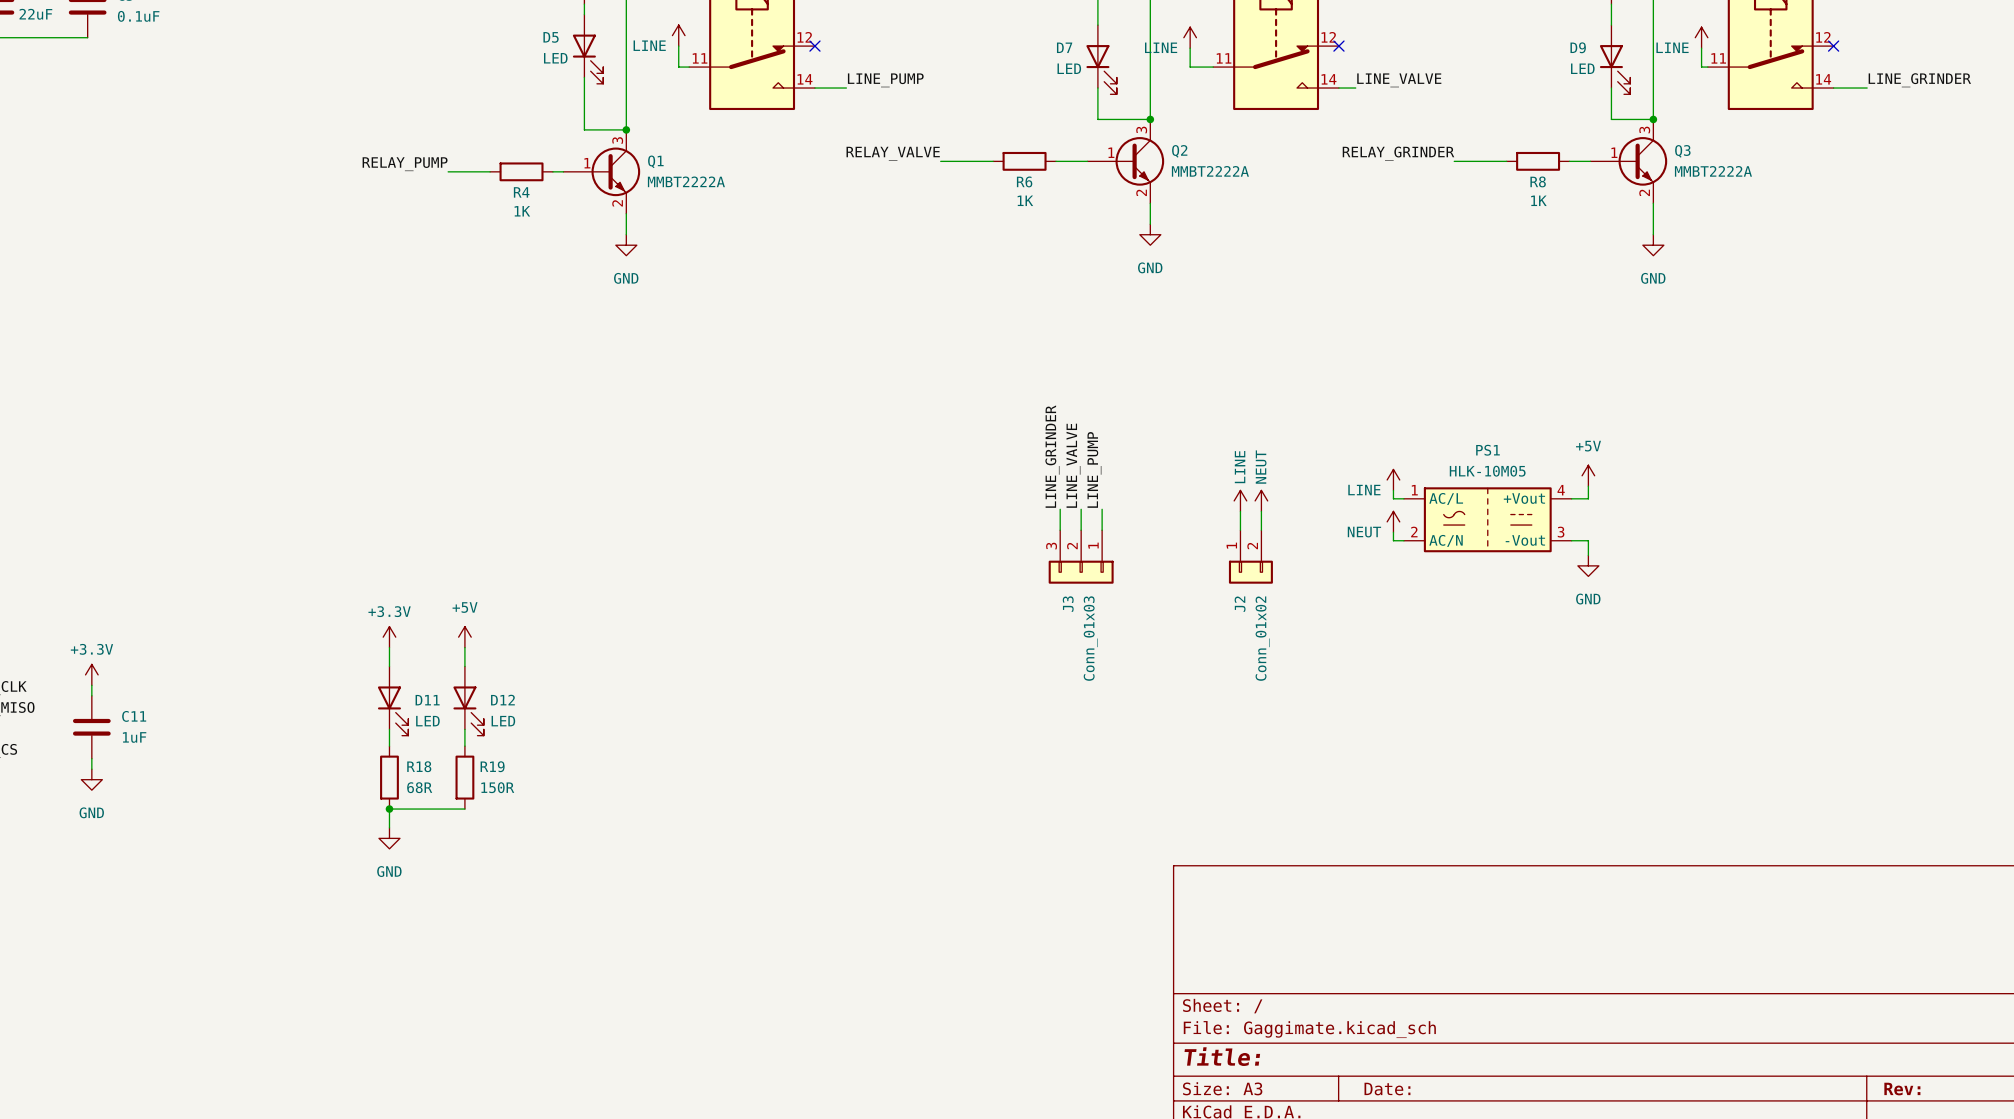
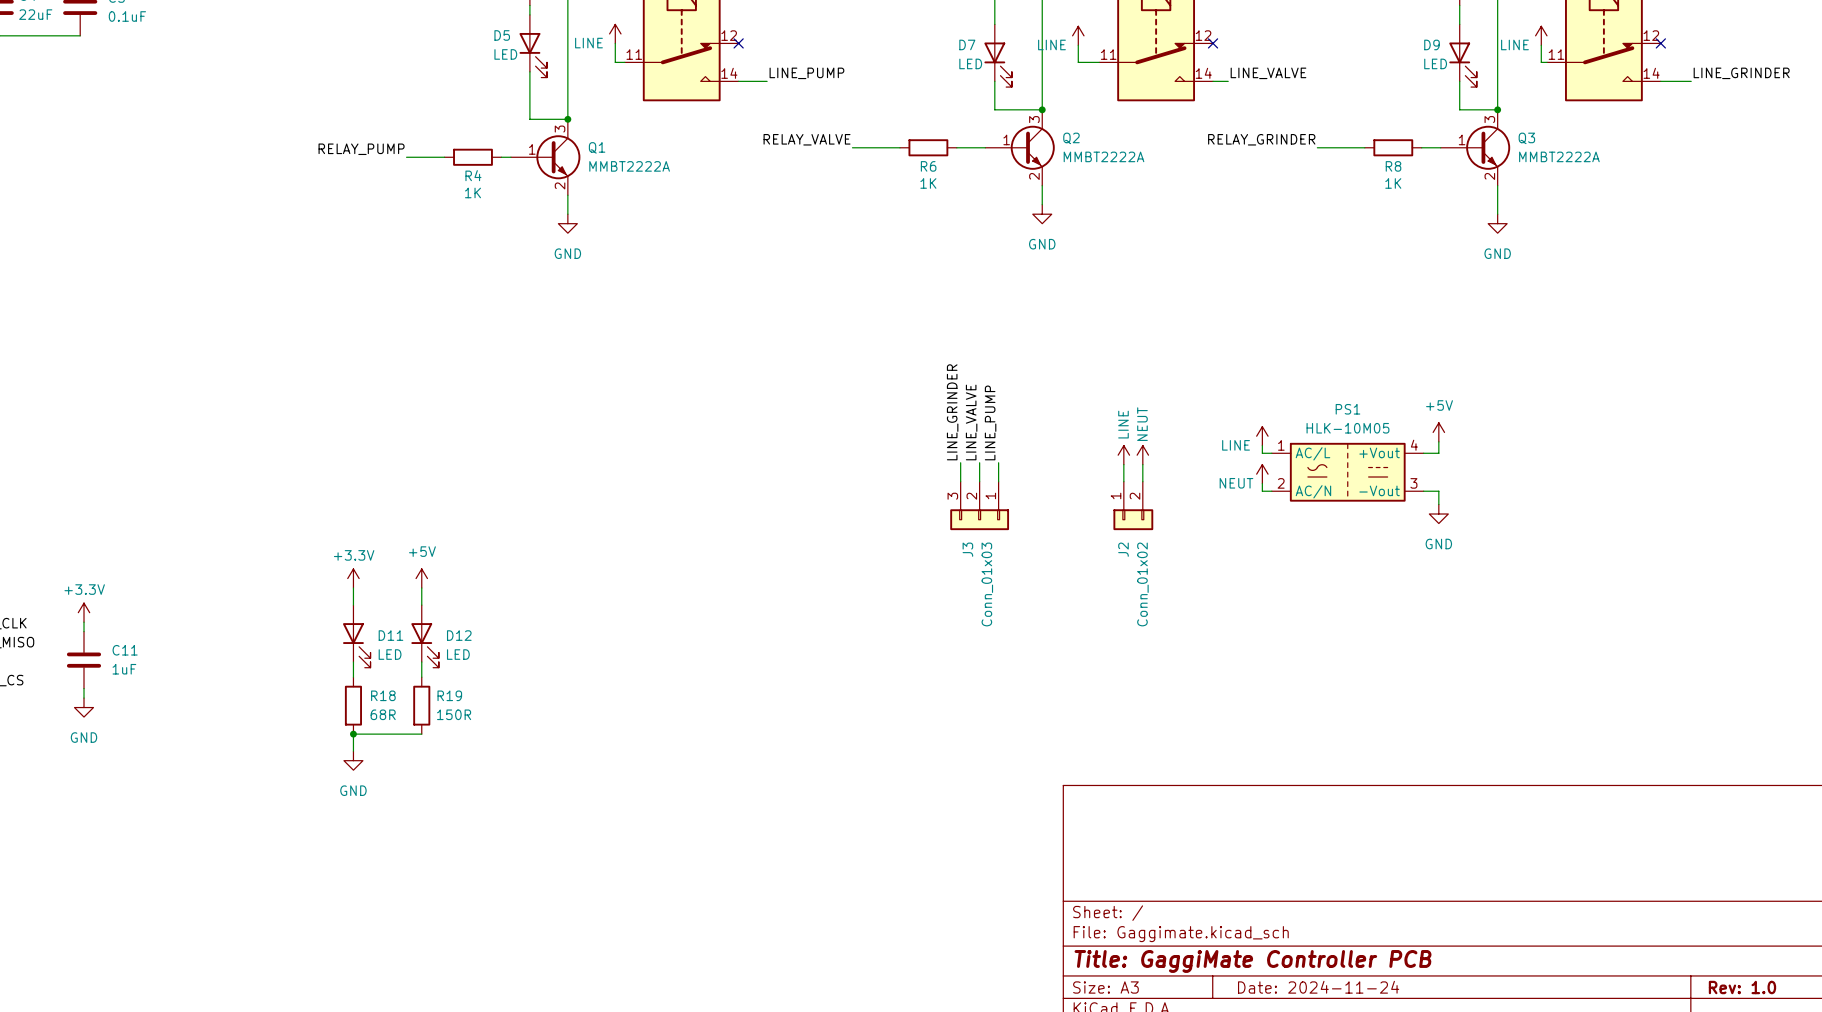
title block: Title: (1222, 1056) -> Title: GaggiMate Controller PCB (1253, 961)
title block: Date: (1387, 1089) -> Date: 2024-11-24 (1318, 987)
title block: Rev: (1902, 1089) -> Rev: 1.0 (1742, 987)

